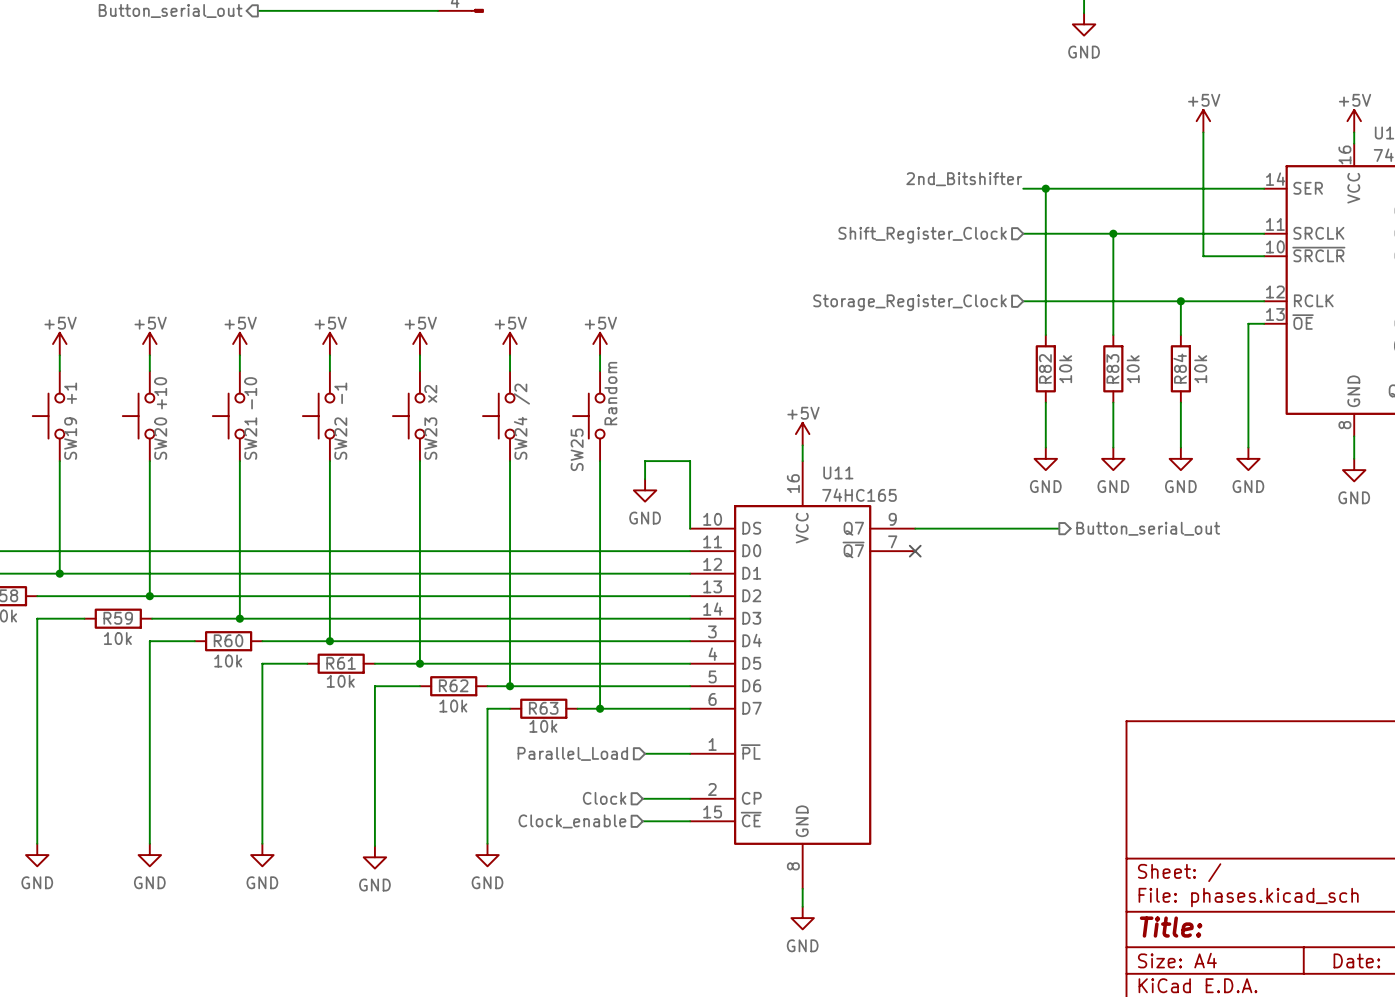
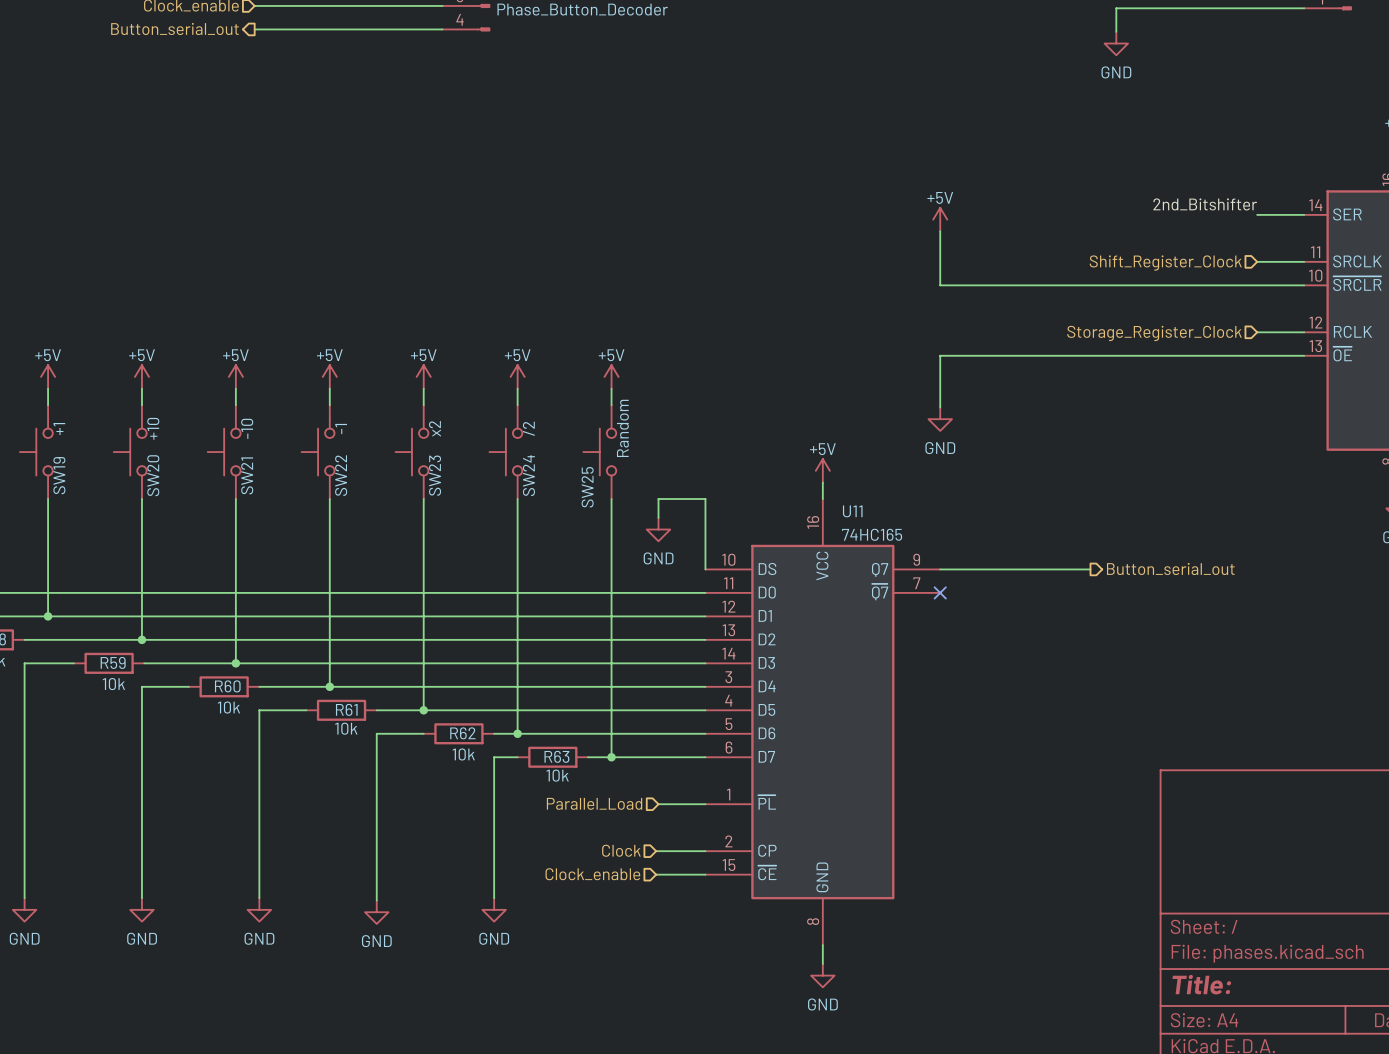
power symbol: +5V (1203, 121) -> none
wire: (1203, 132) (1203, 256) -> (940, 231) (940, 285) (1240, 285)
label position: 2nd_Bitshifter (964, 179) -> 2nd_Bitshifter (1205, 204)
wire: (1023, 188) (1219, 188) -> none
wire: (1045, 188) (1045, 335) -> none
junction: (1045, 188) -> none
power symbol: none -> +5V (940, 219)
wire: (1023, 233) (1219, 233) -> none
wire: (1113, 233) (1113, 335) -> none
junction: (1113, 233) -> none
hierarchical label position: Shift_Register_Clock (922, 235) -> Shift_Register_Clock (1165, 263)
wire: (1023, 301) (1219, 301) -> none
wire: (1180, 301) (1180, 335) -> none
junction: (1180, 301) -> none
hierarchical label position: Storage_Register_Clock (910, 302) -> Storage_Register_Clock (1154, 333)
wire: (1248, 323) (1248, 447) -> (1287, 355) (940, 355) (940, 407)
R82: 10k (1045, 368) -> none
R83: 10k (1113, 368) -> none
R84: 10k (1180, 368) -> none
power symbol: none -> GND (940, 419)
wire: (1045, 402) (1045, 447) -> none
wire: (1113, 402) (1113, 447) -> none
wire: (1180, 402) (1180, 447) -> none
power symbol: GND (1045, 458) -> none
power symbol: GND (1113, 458) -> none
power symbol: GND (1180, 458) -> none
power symbol: GND (1248, 458) -> none

